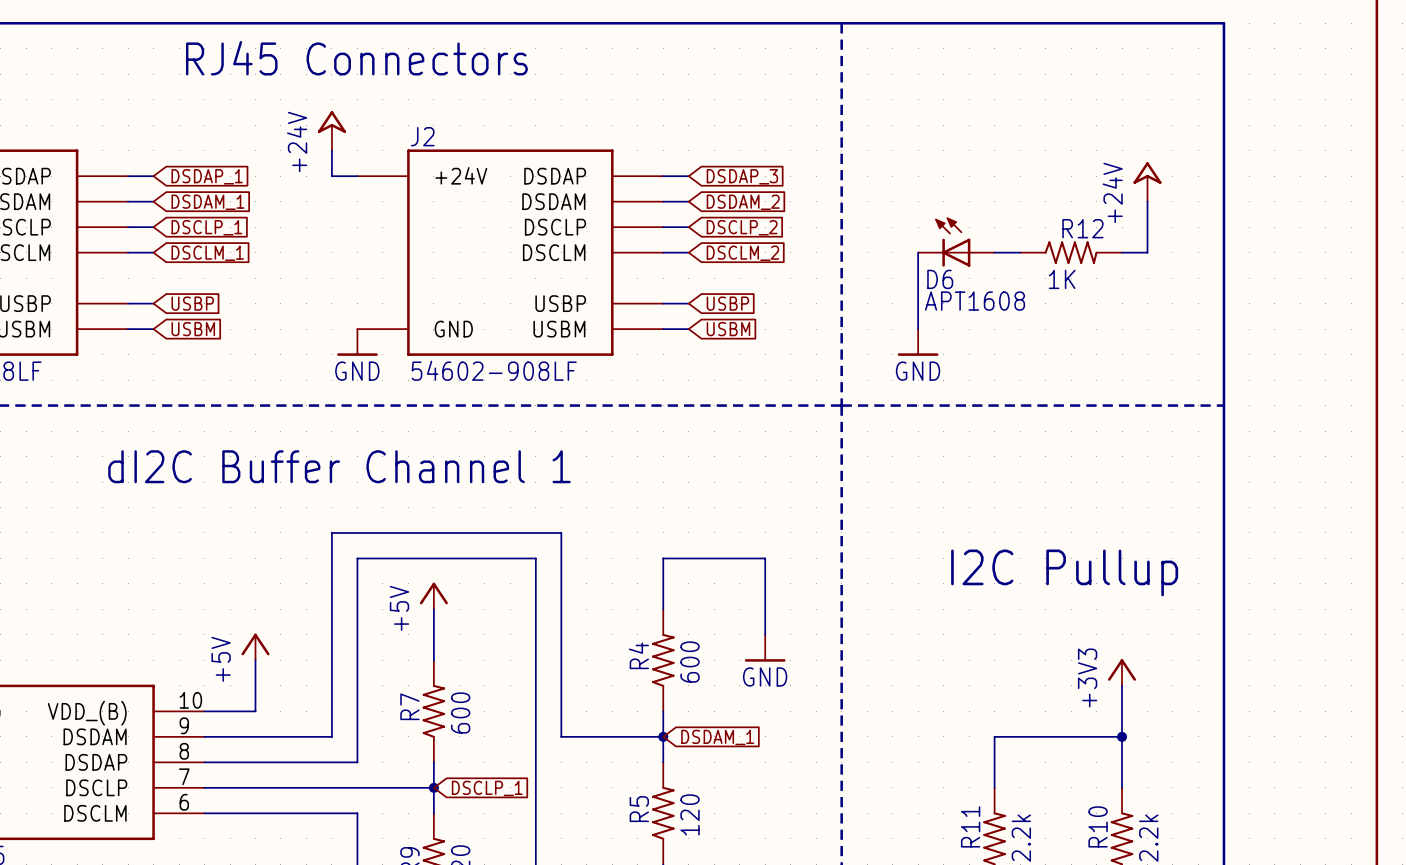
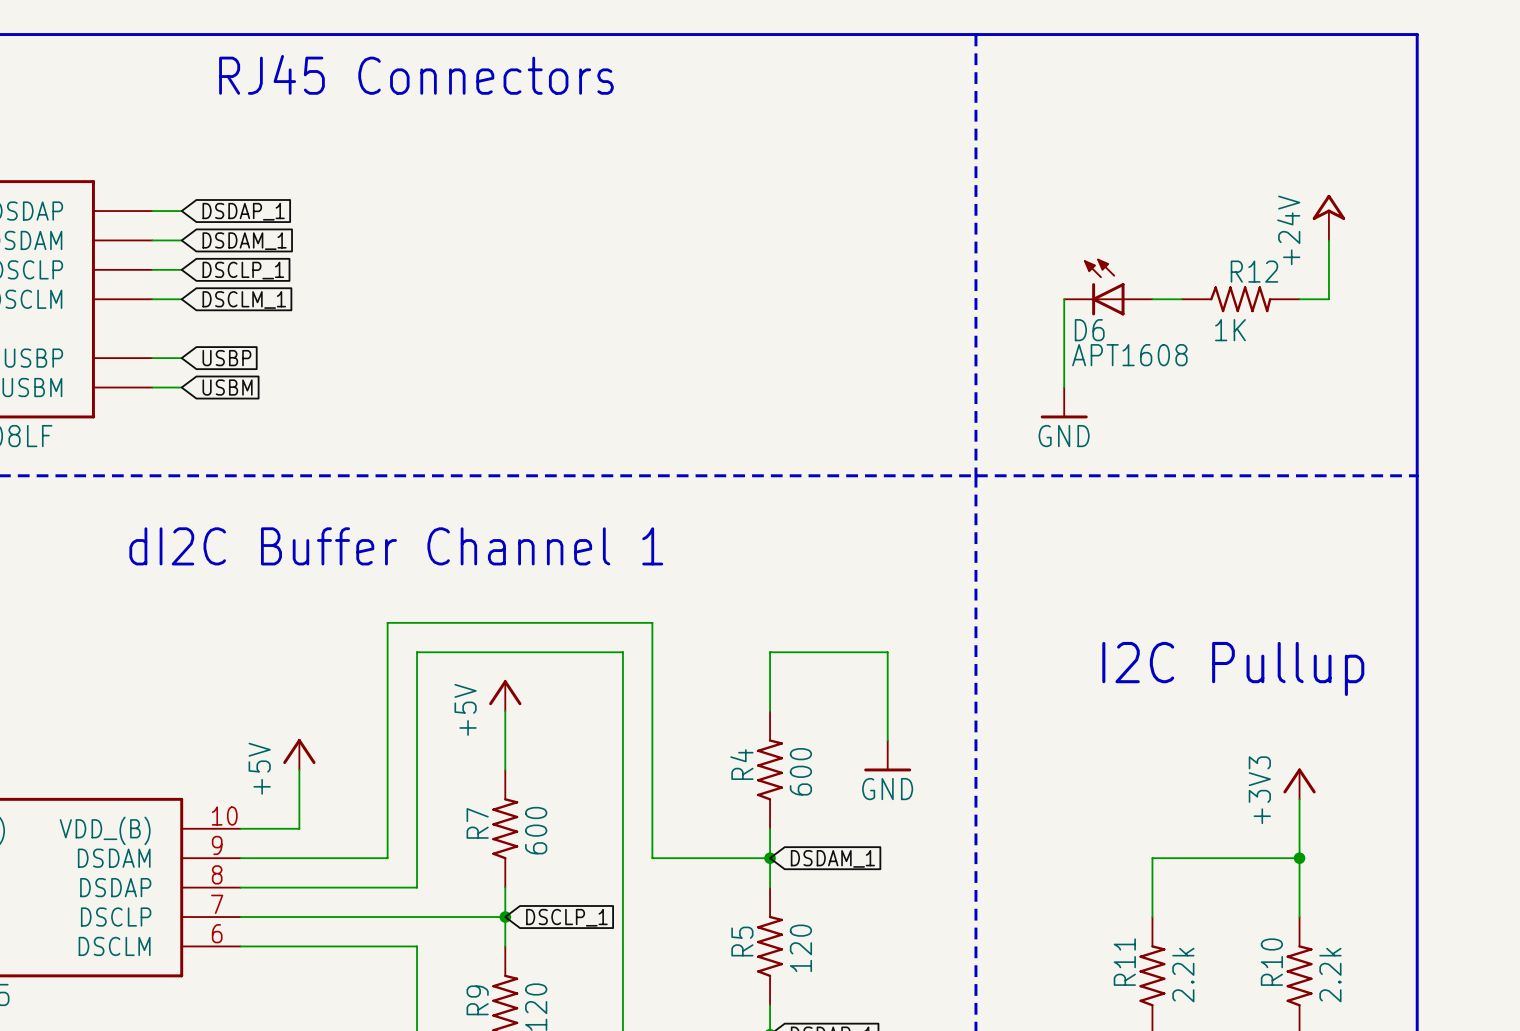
power symbol: +24V (331, 130) -> none
wire: (331, 150) (331, 176) (357, 176) -> none
wire: (663, 176) (688, 176) -> none
global label: DSDAP_3 (742, 176) -> none
wire: (663, 201) (688, 201) -> none
global label: DSDAM_2 (743, 202) -> none
wire: (663, 227) (688, 227) -> none
global label: DSCLP_2 (742, 227) -> none
J2: 54602-908LF (510, 252) -> none
wire: (663, 252) (688, 252) -> none
global label: DSCLM_2 (742, 253) -> none
wire: (663, 303) (688, 303) -> none
global label: USBP (727, 303) -> none
wire: (663, 329) (688, 329) -> none
global label: USBM (728, 329) -> none
power symbol: GND (357, 342) -> none

